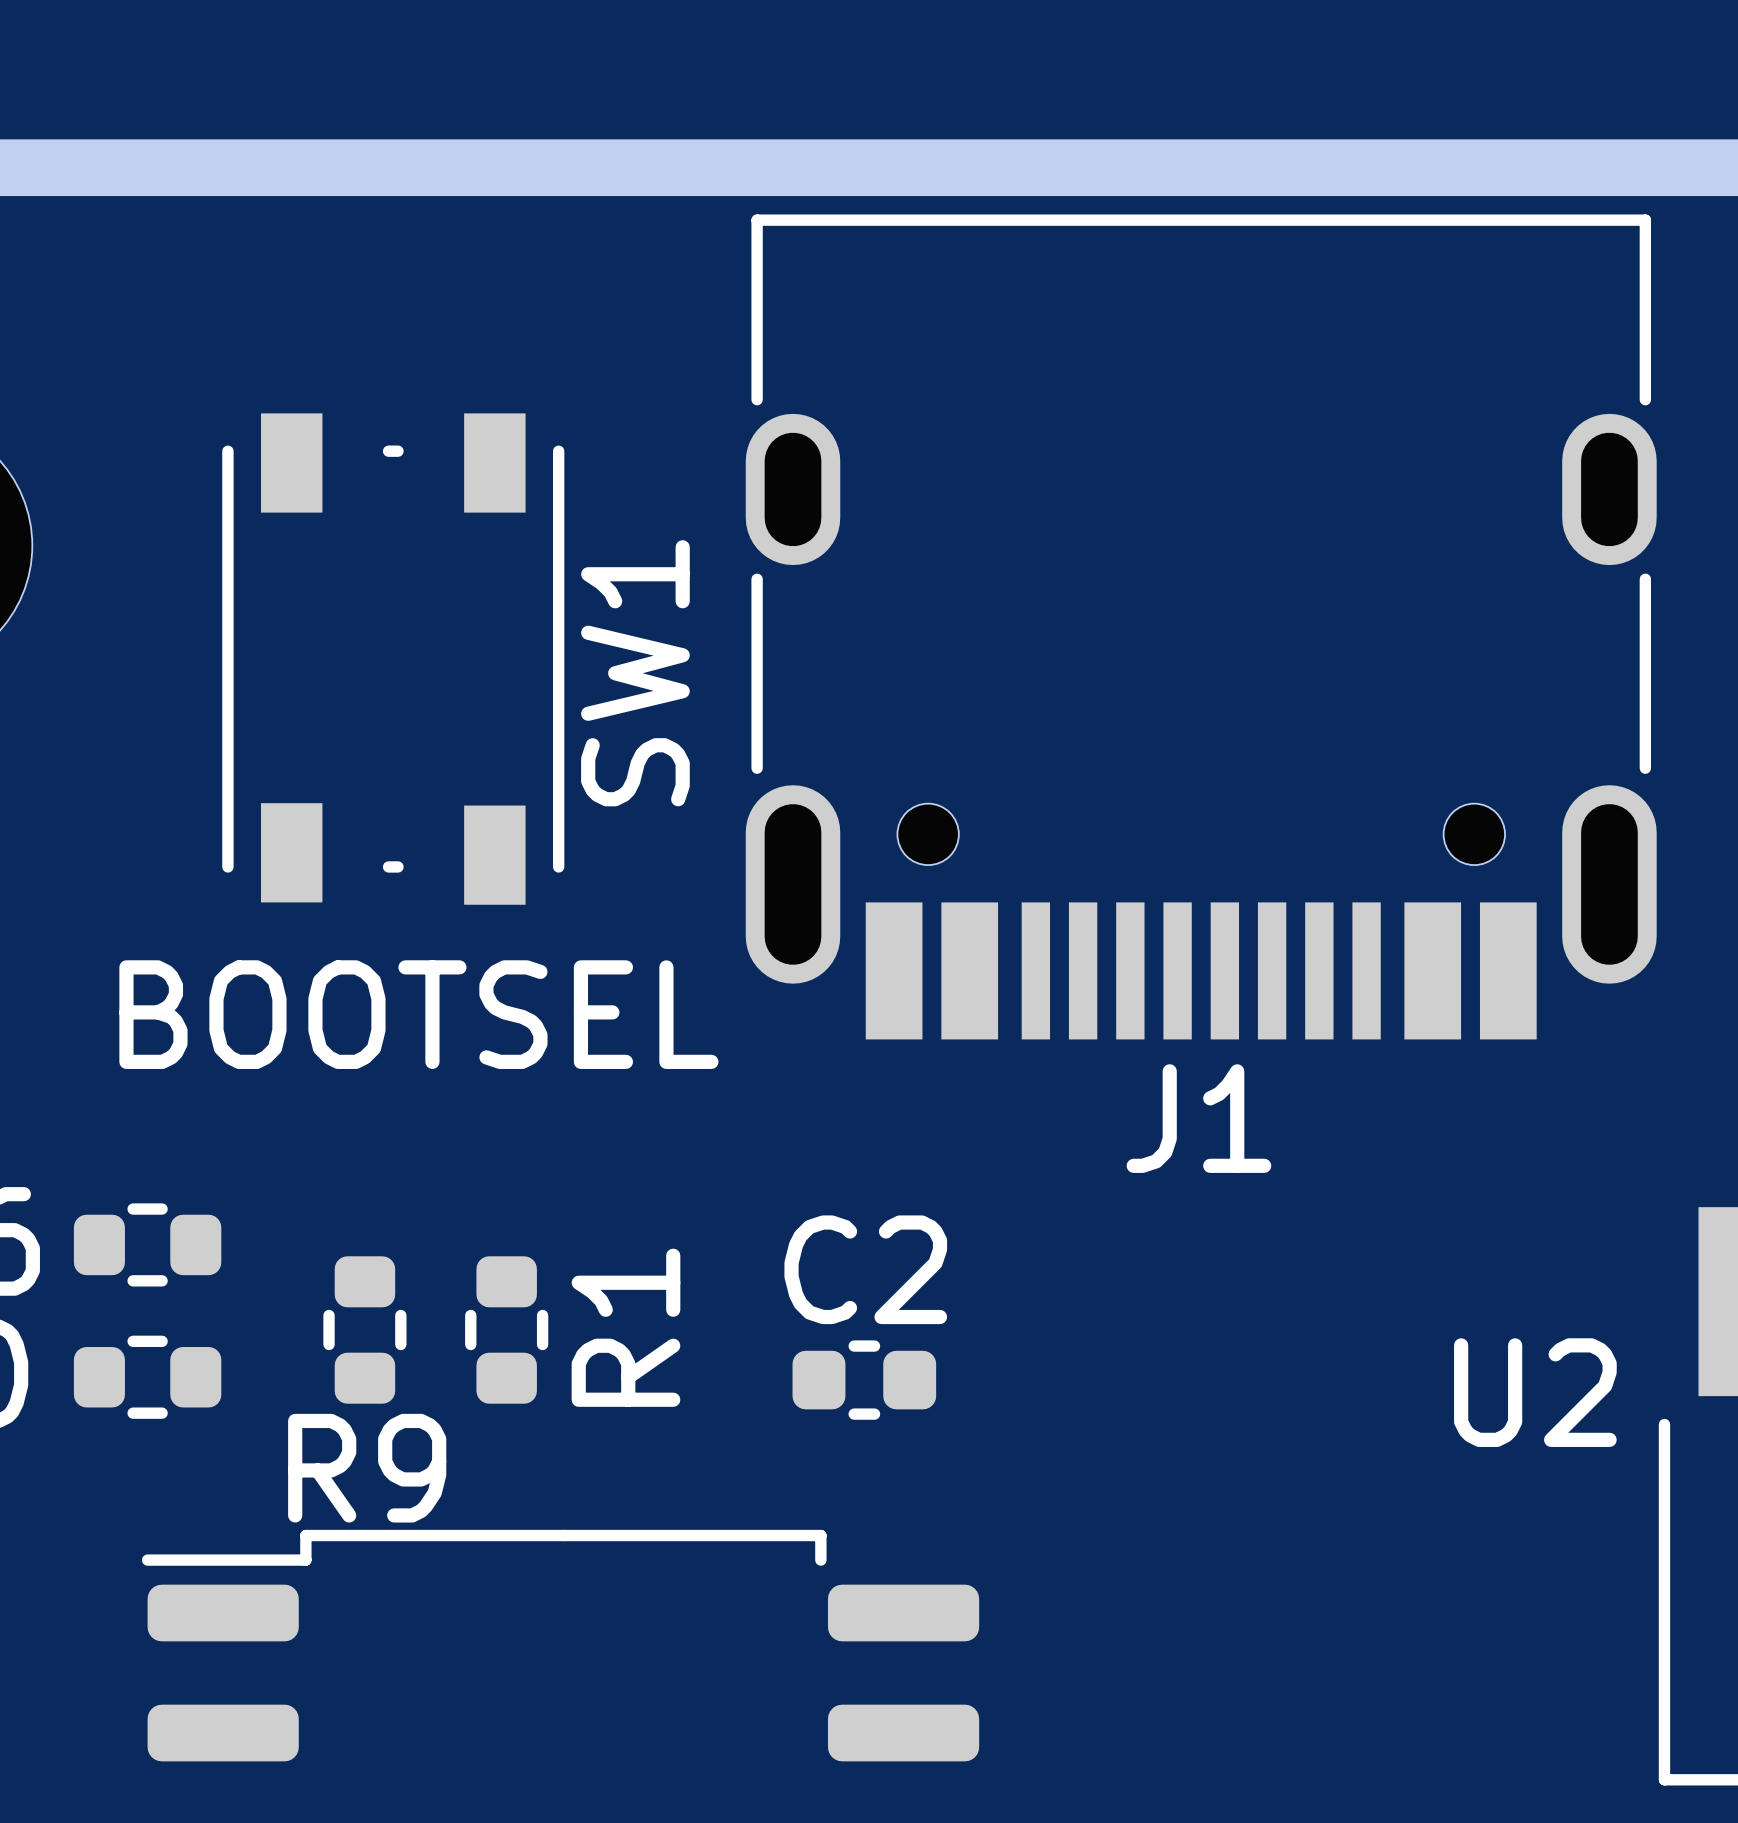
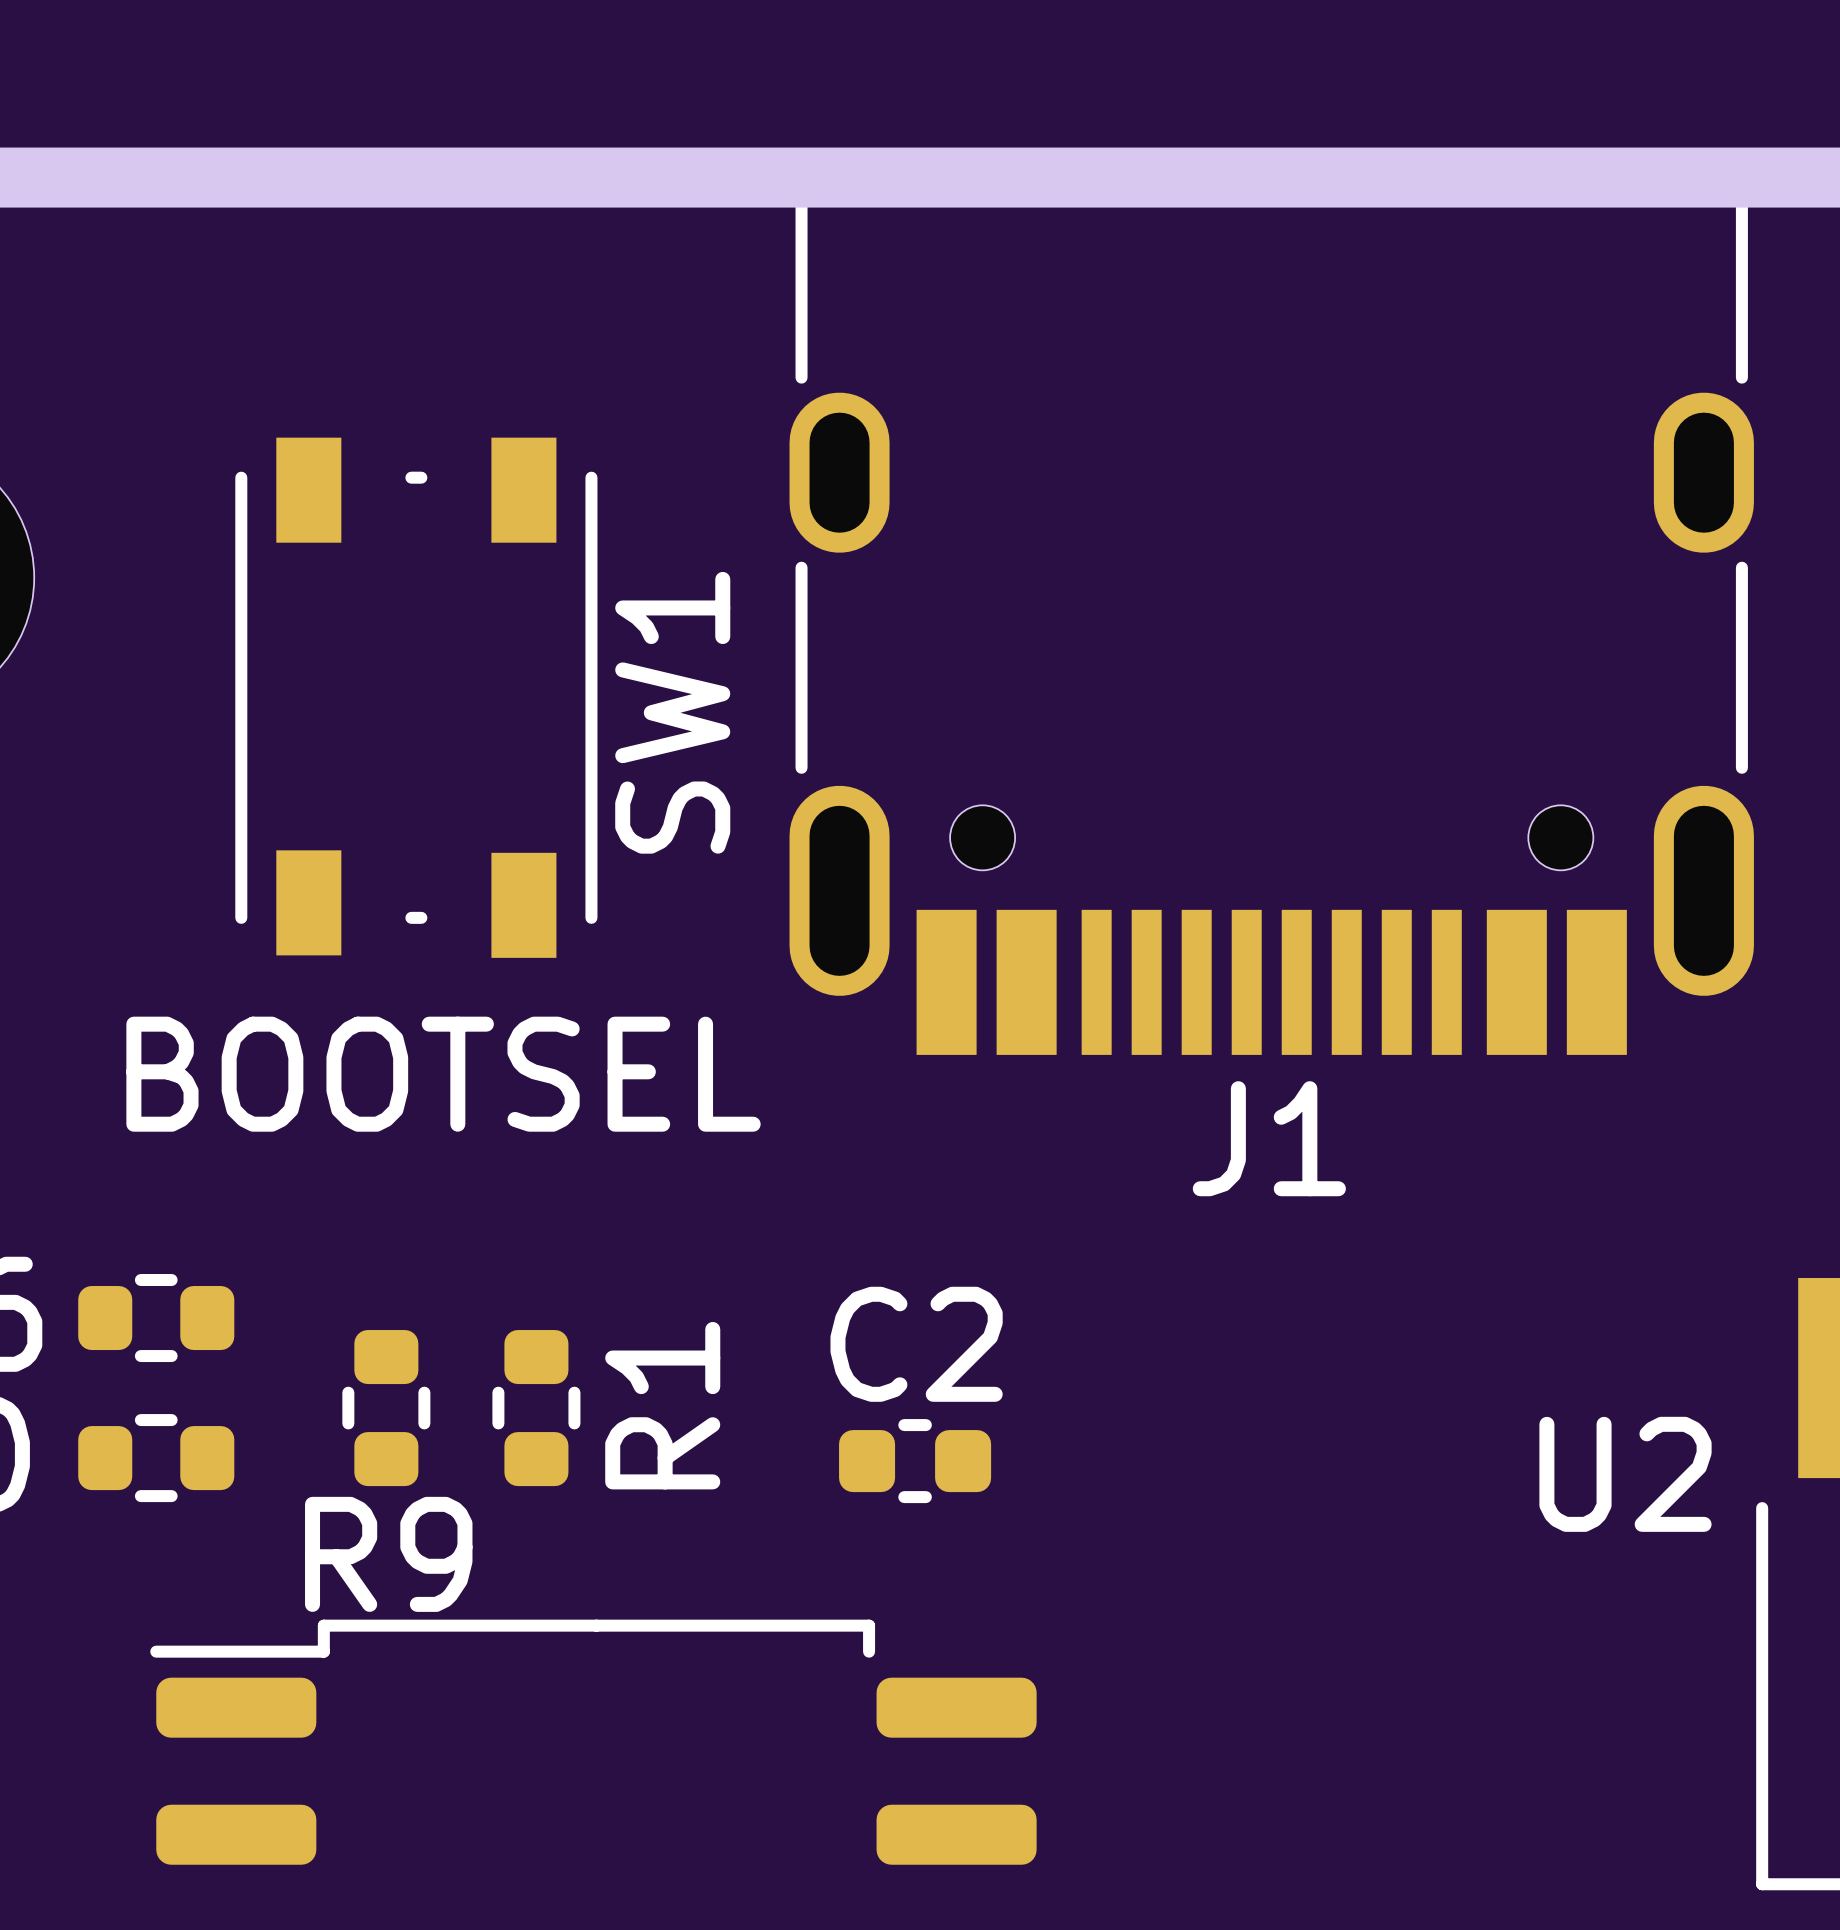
J1 position: (1201, 626) -> (1271, 618)

